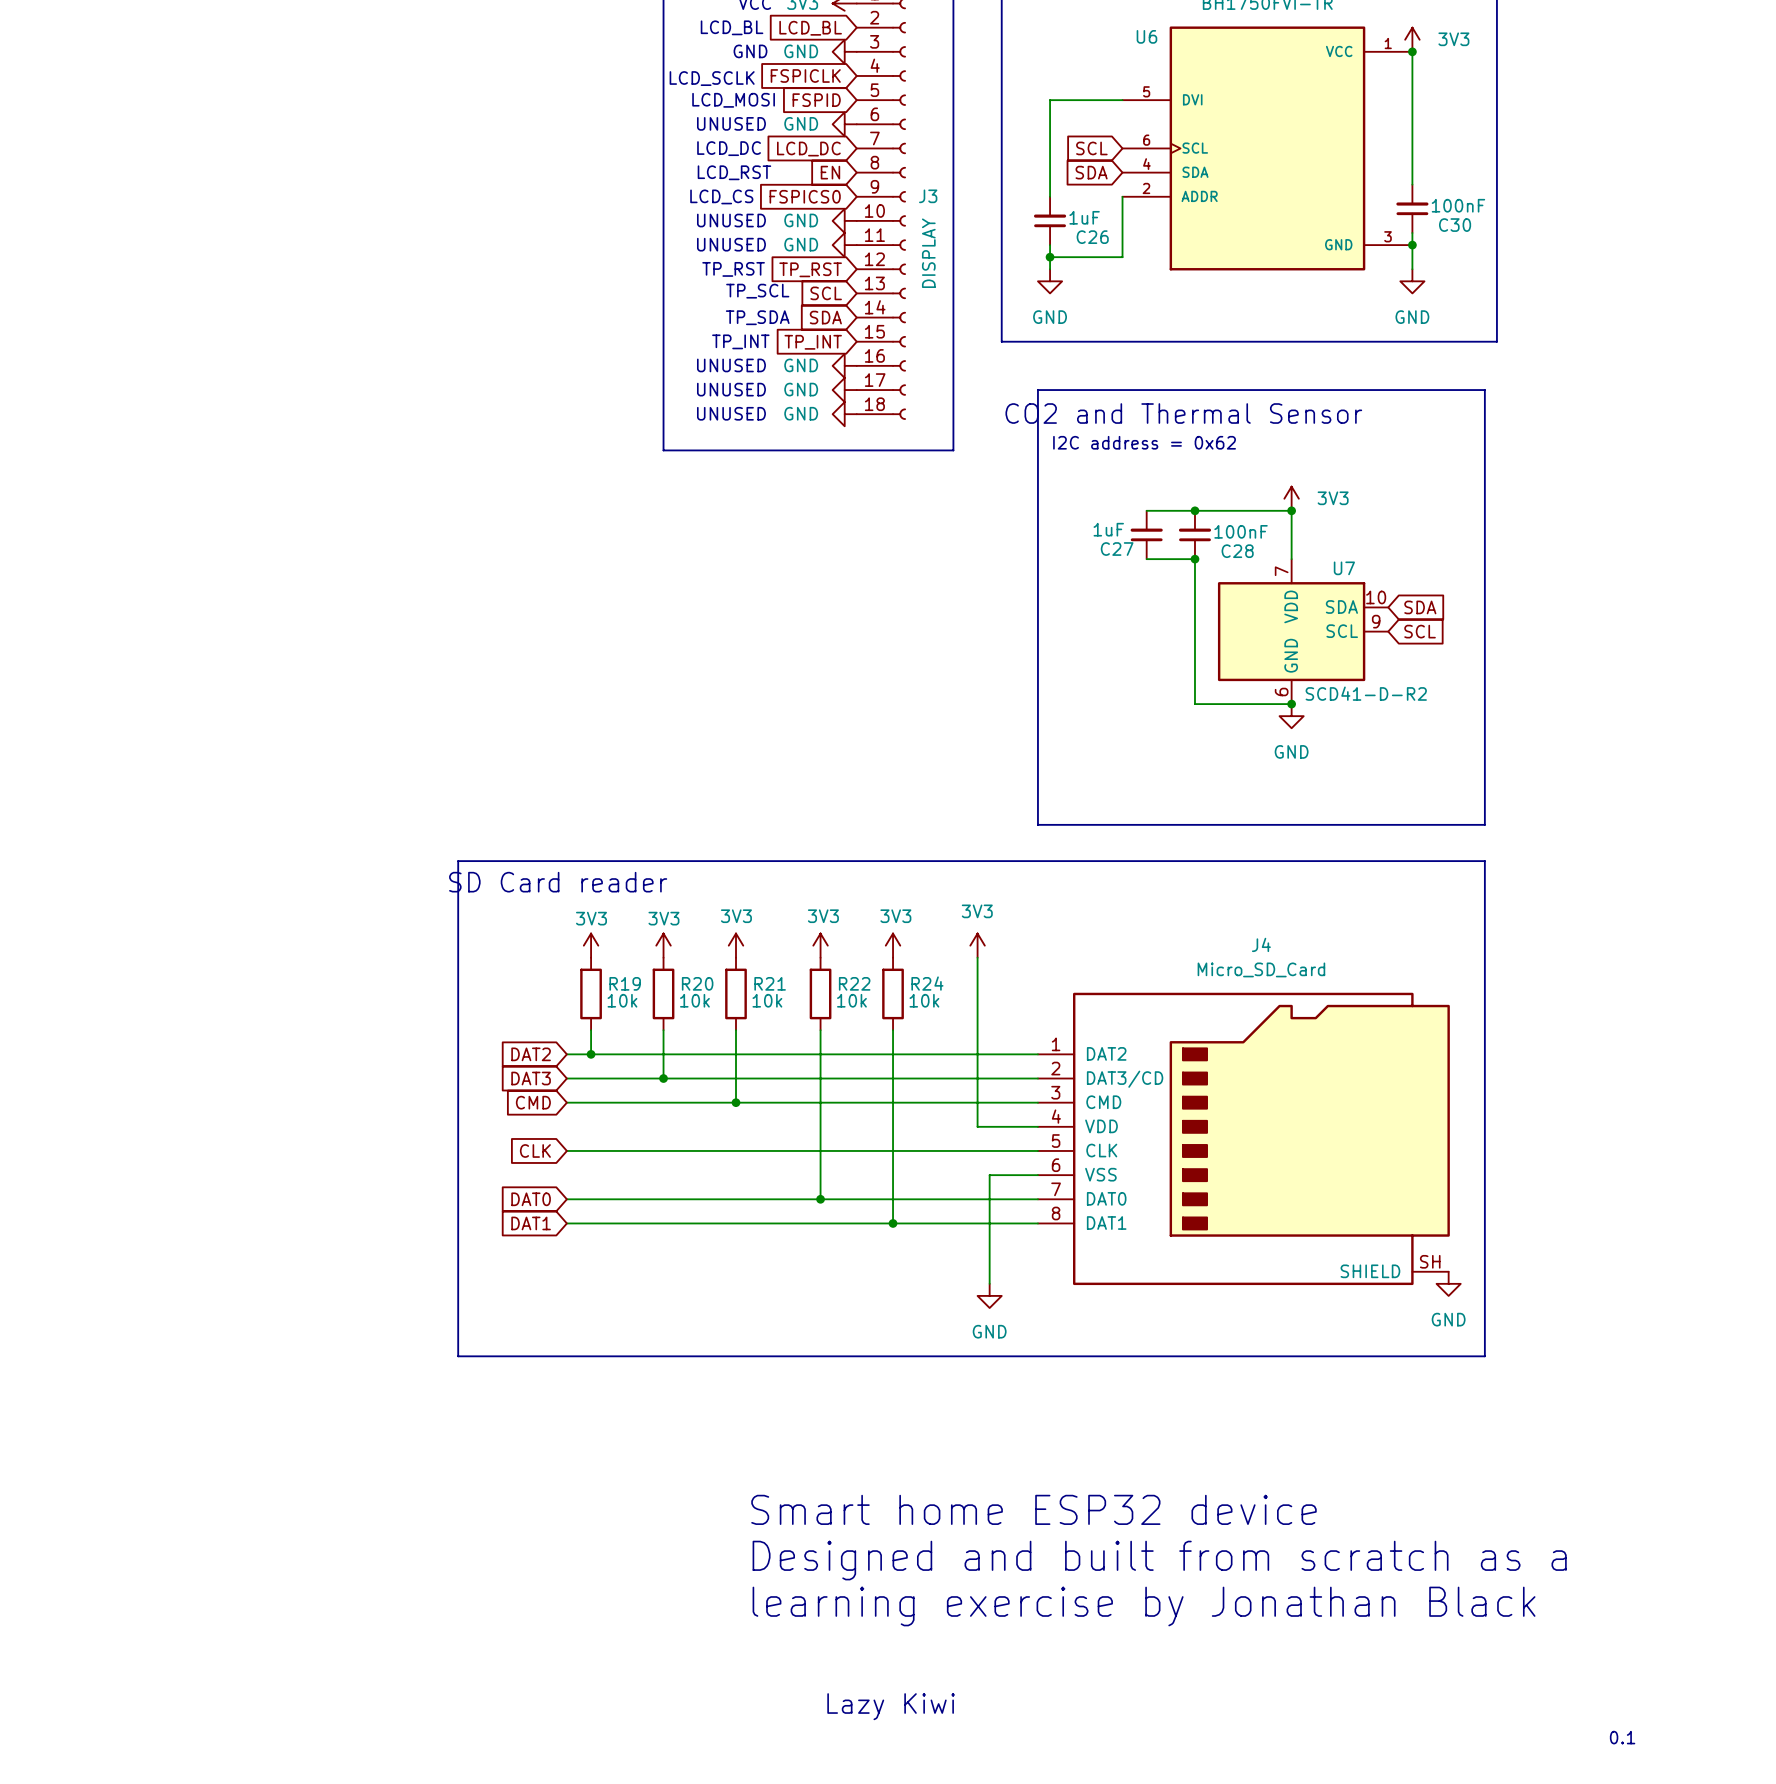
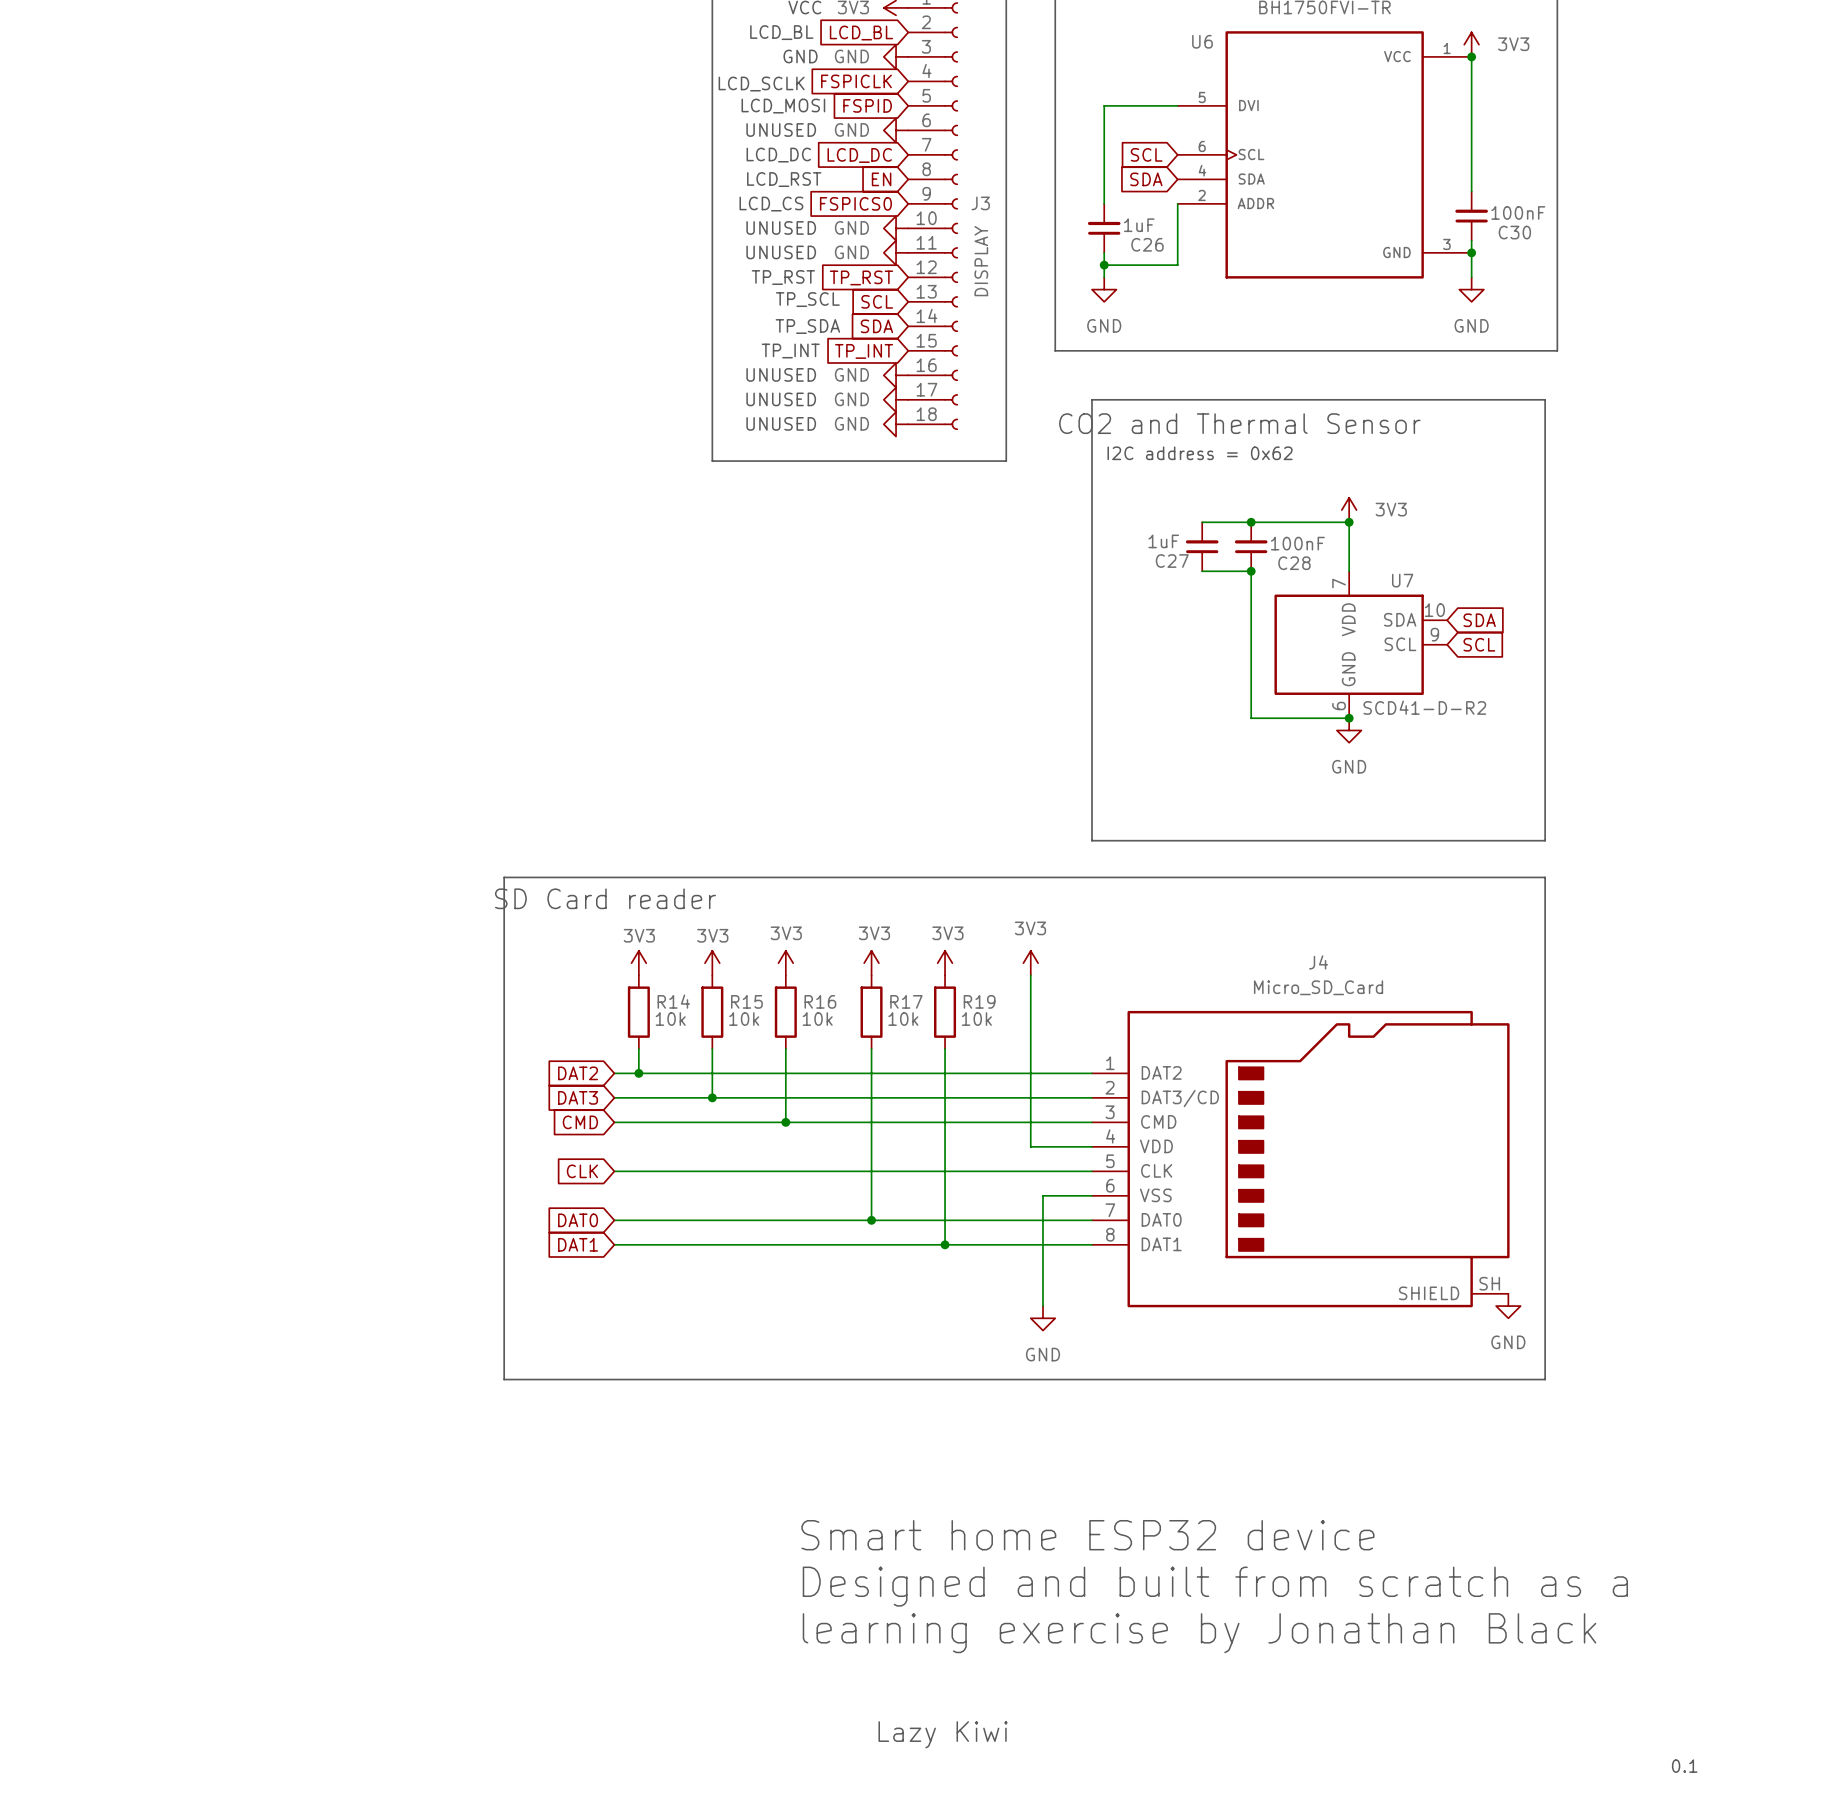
R19 name: R19 (625, 983) -> R14 (673, 1001)
R20 name: R20 (697, 983) -> R15 (746, 1001)
R21 name: R21 (770, 983) -> R16 (820, 1001)
R22 name: R22 (854, 983) -> R17 (906, 1001)
R24 name: R24 (927, 983) -> R19 (979, 1001)

